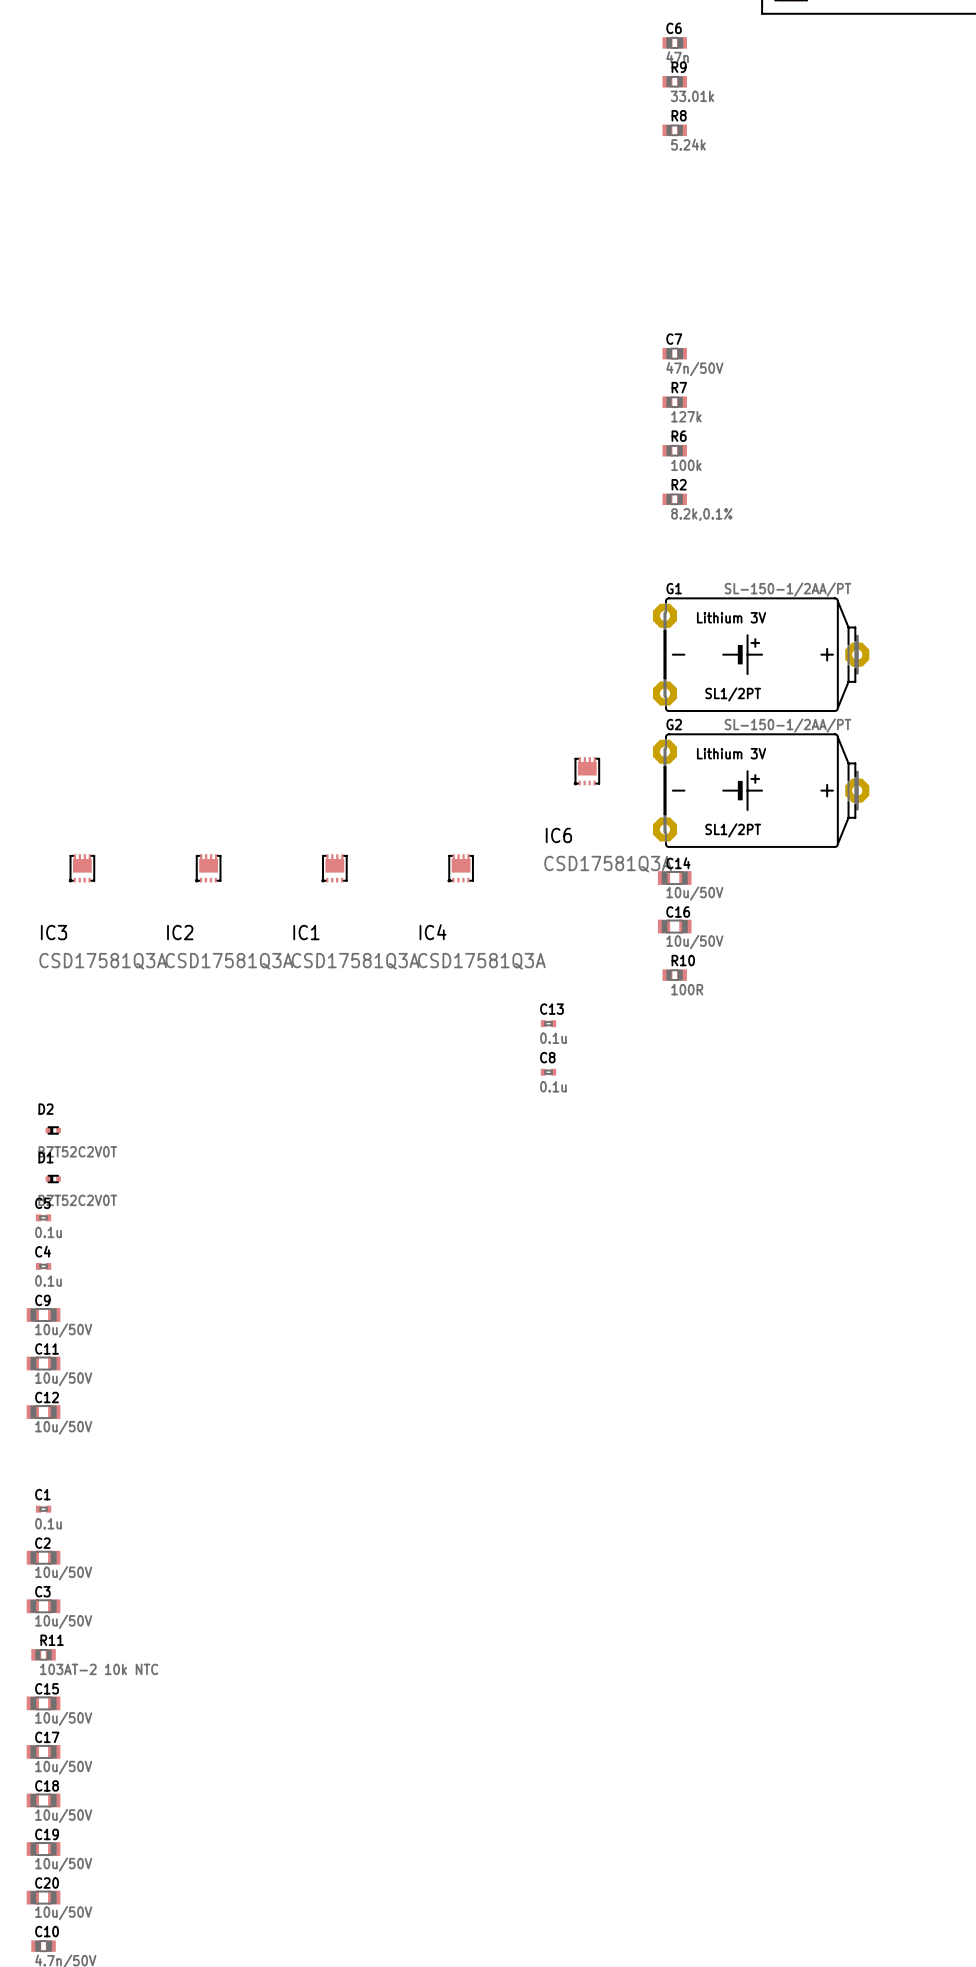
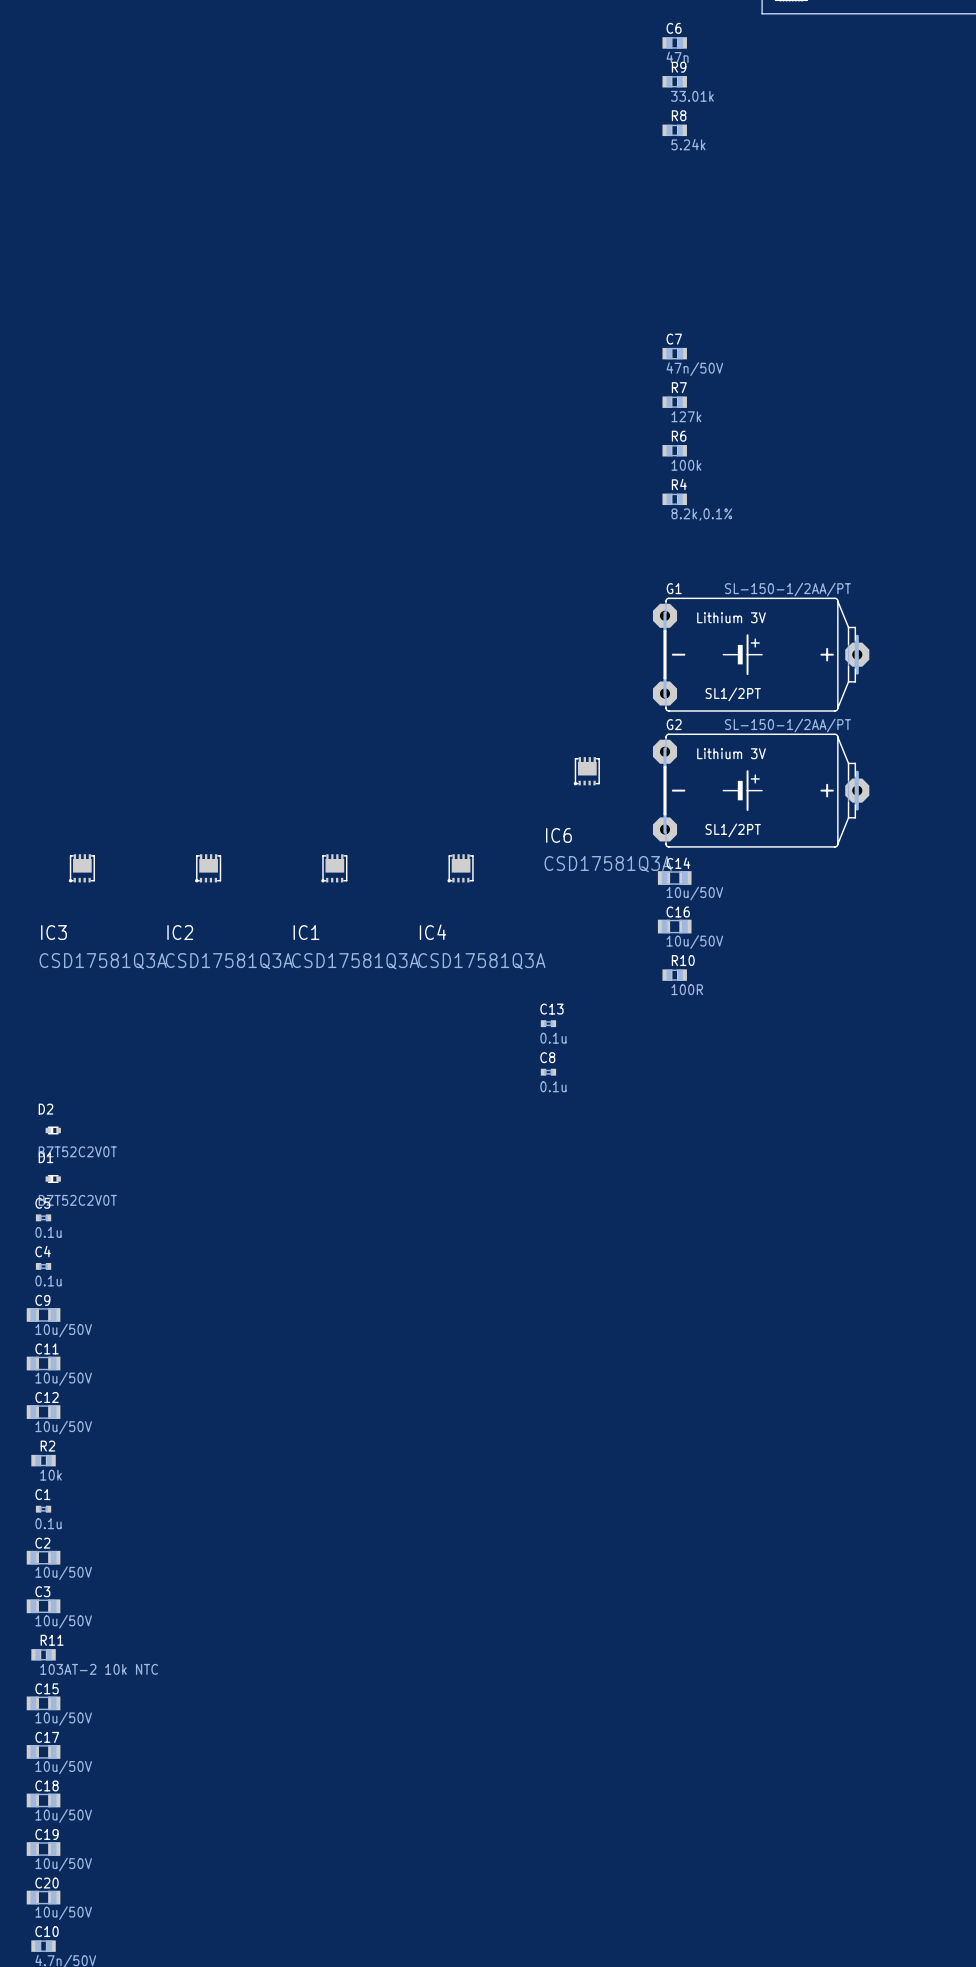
R2 name: R2 (679, 484) -> R4 (679, 484)
R2: none -> 10k (43, 1460)

